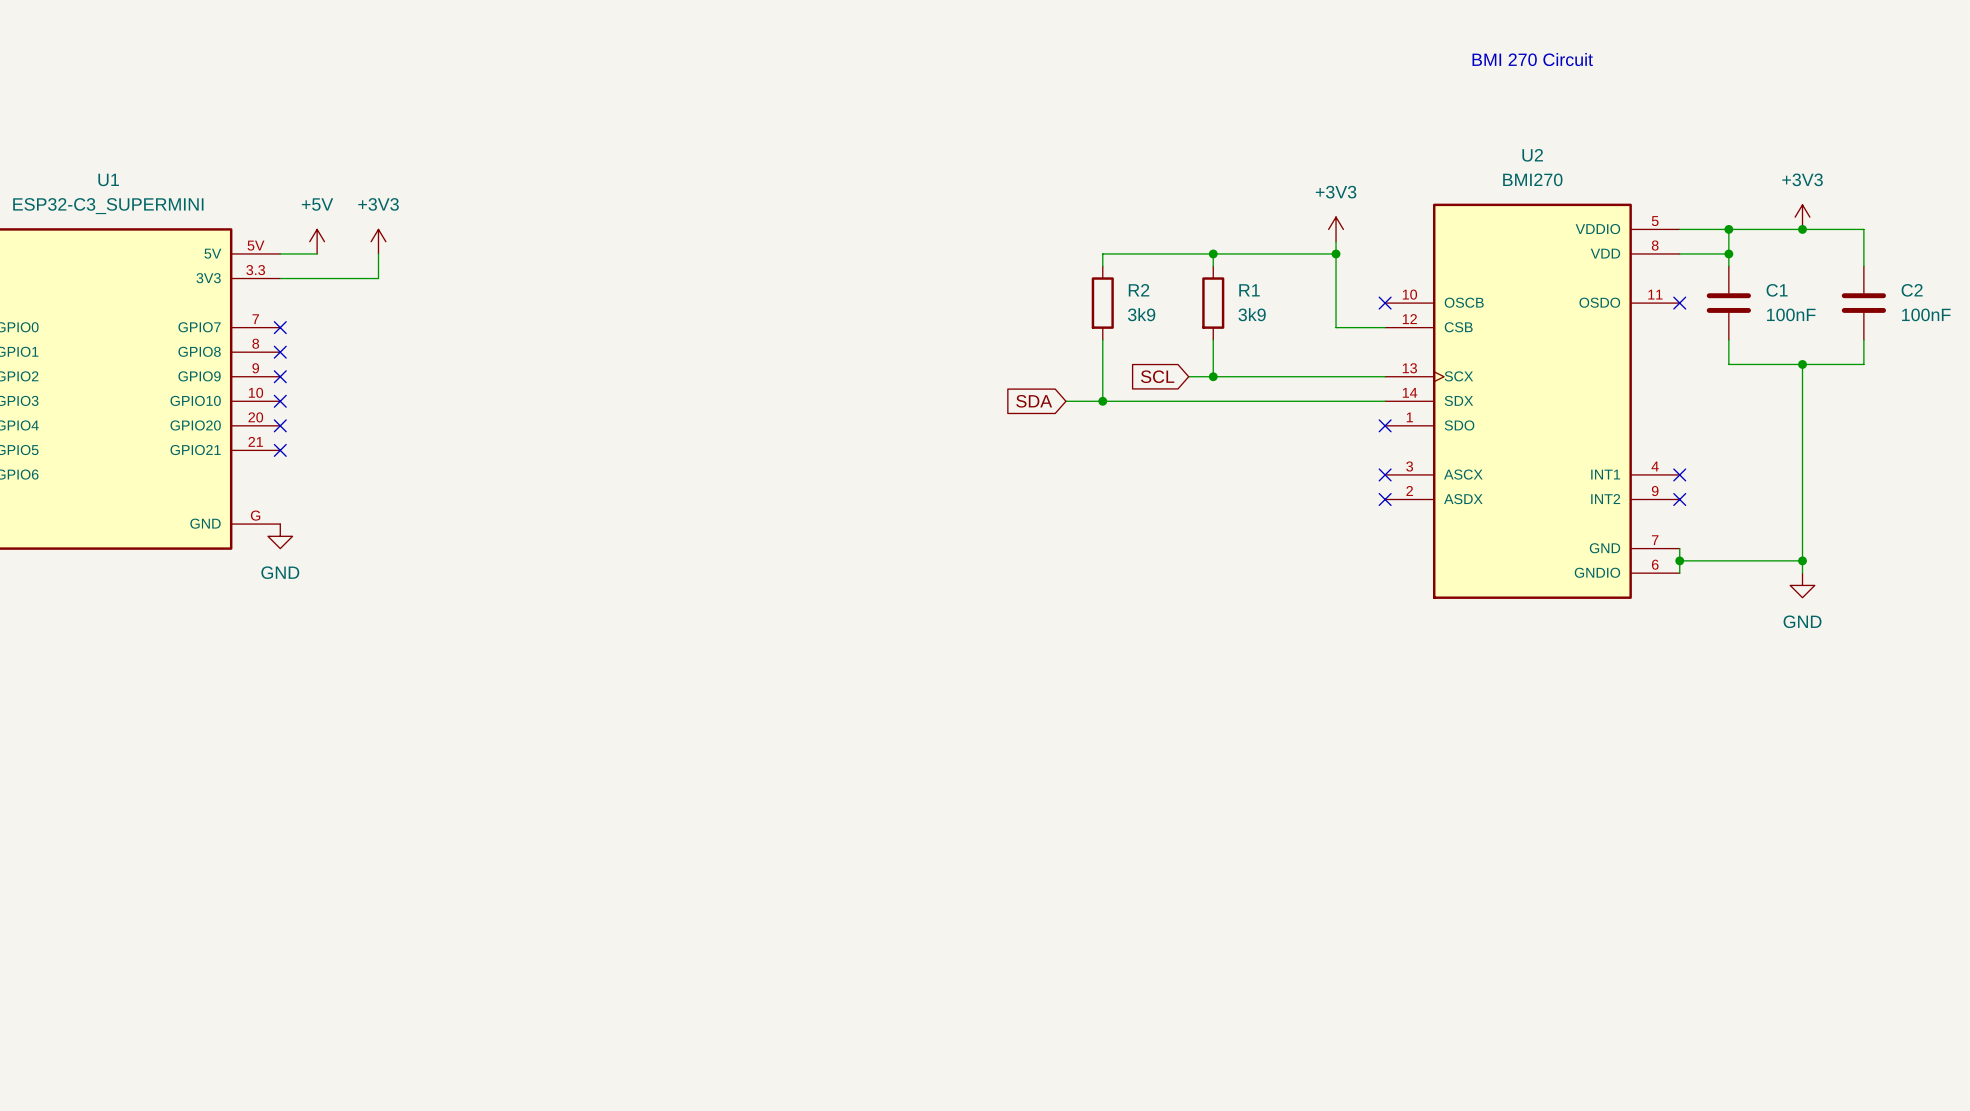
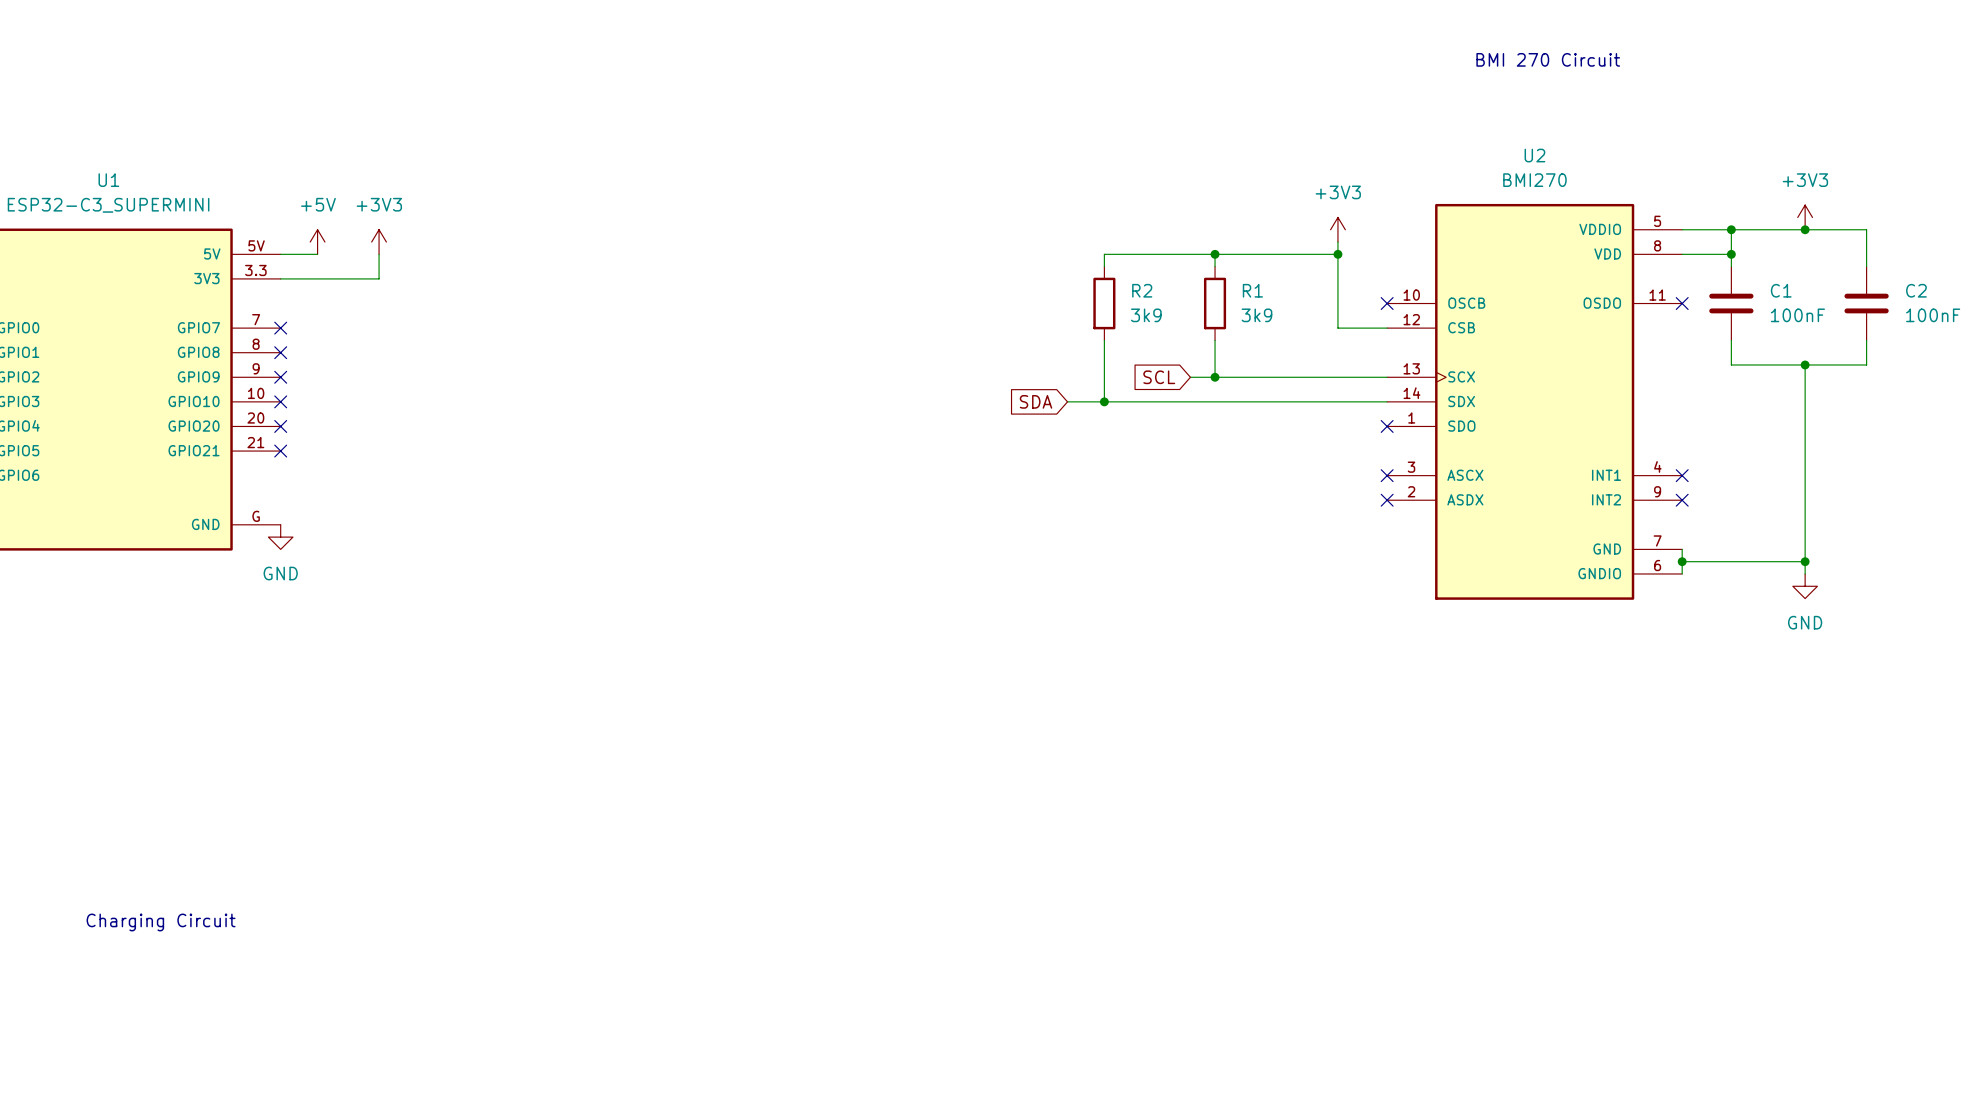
text: none -> Charging Circuit (161, 922)

